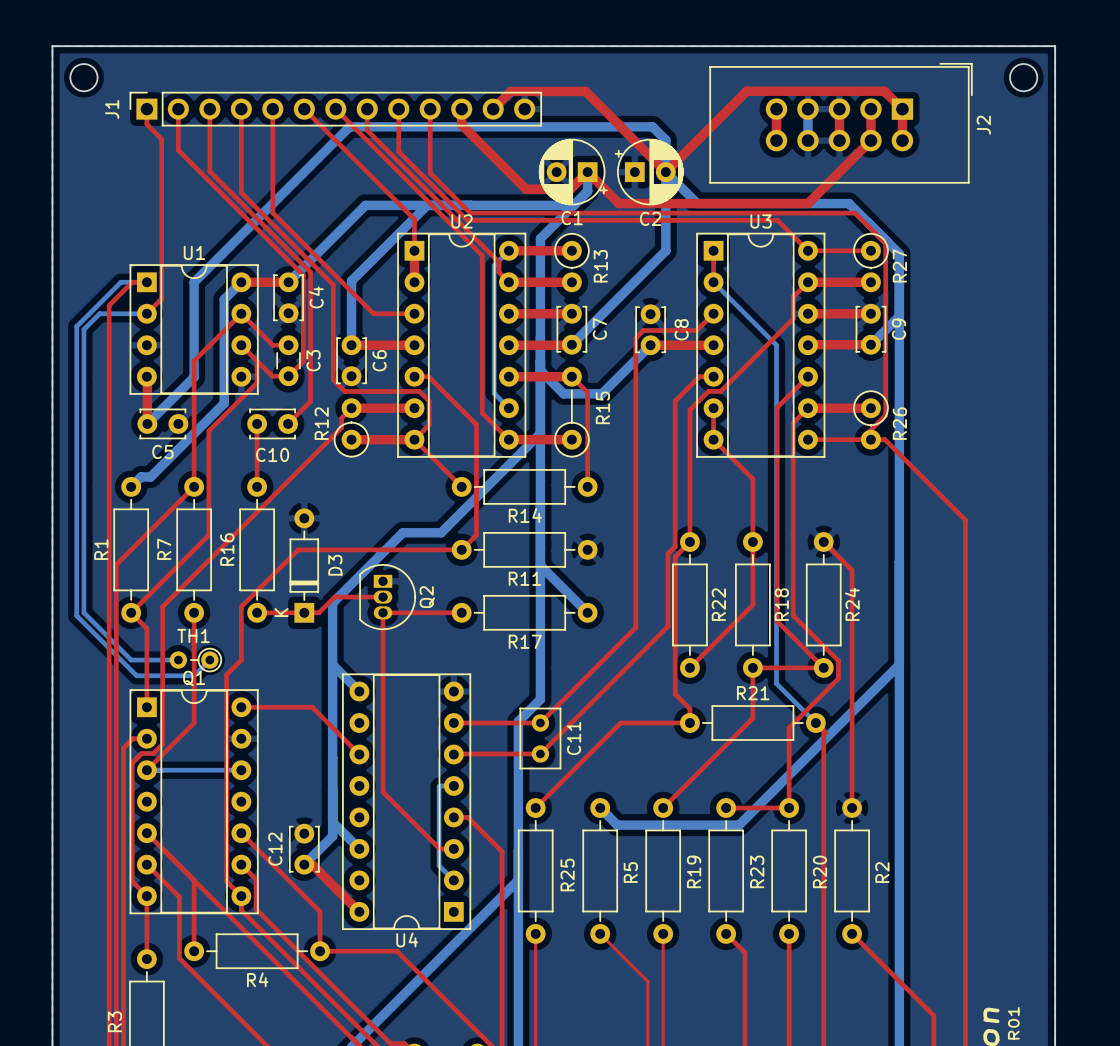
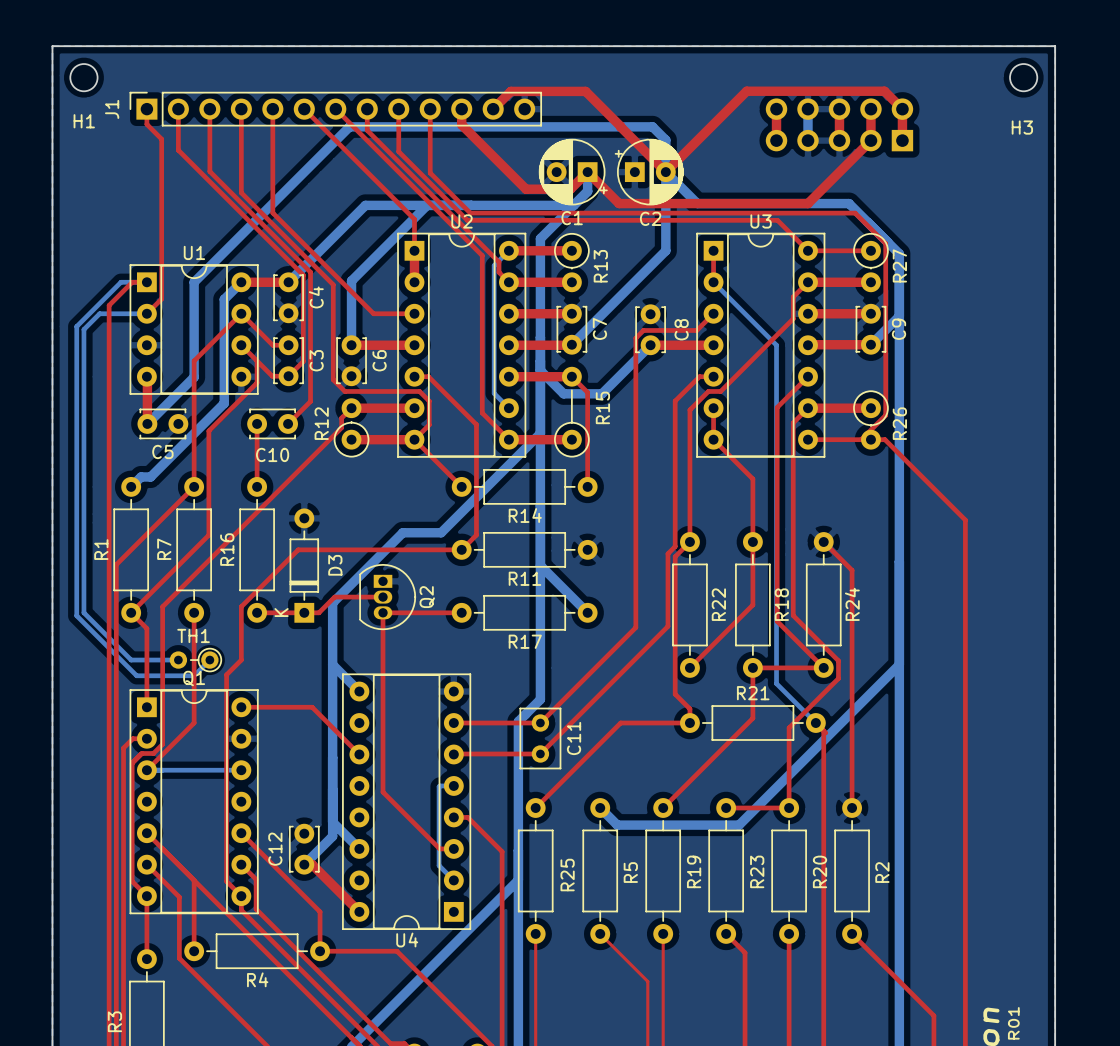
H1 name: none -> H1 (84, 121)
J2 side: top (841, 123) -> bottom (839, 124)
H3 name: none -> H3 (1022, 127)
C3 footprint: [276, 335, 301, 387] -> [273, 335, 304, 387]

